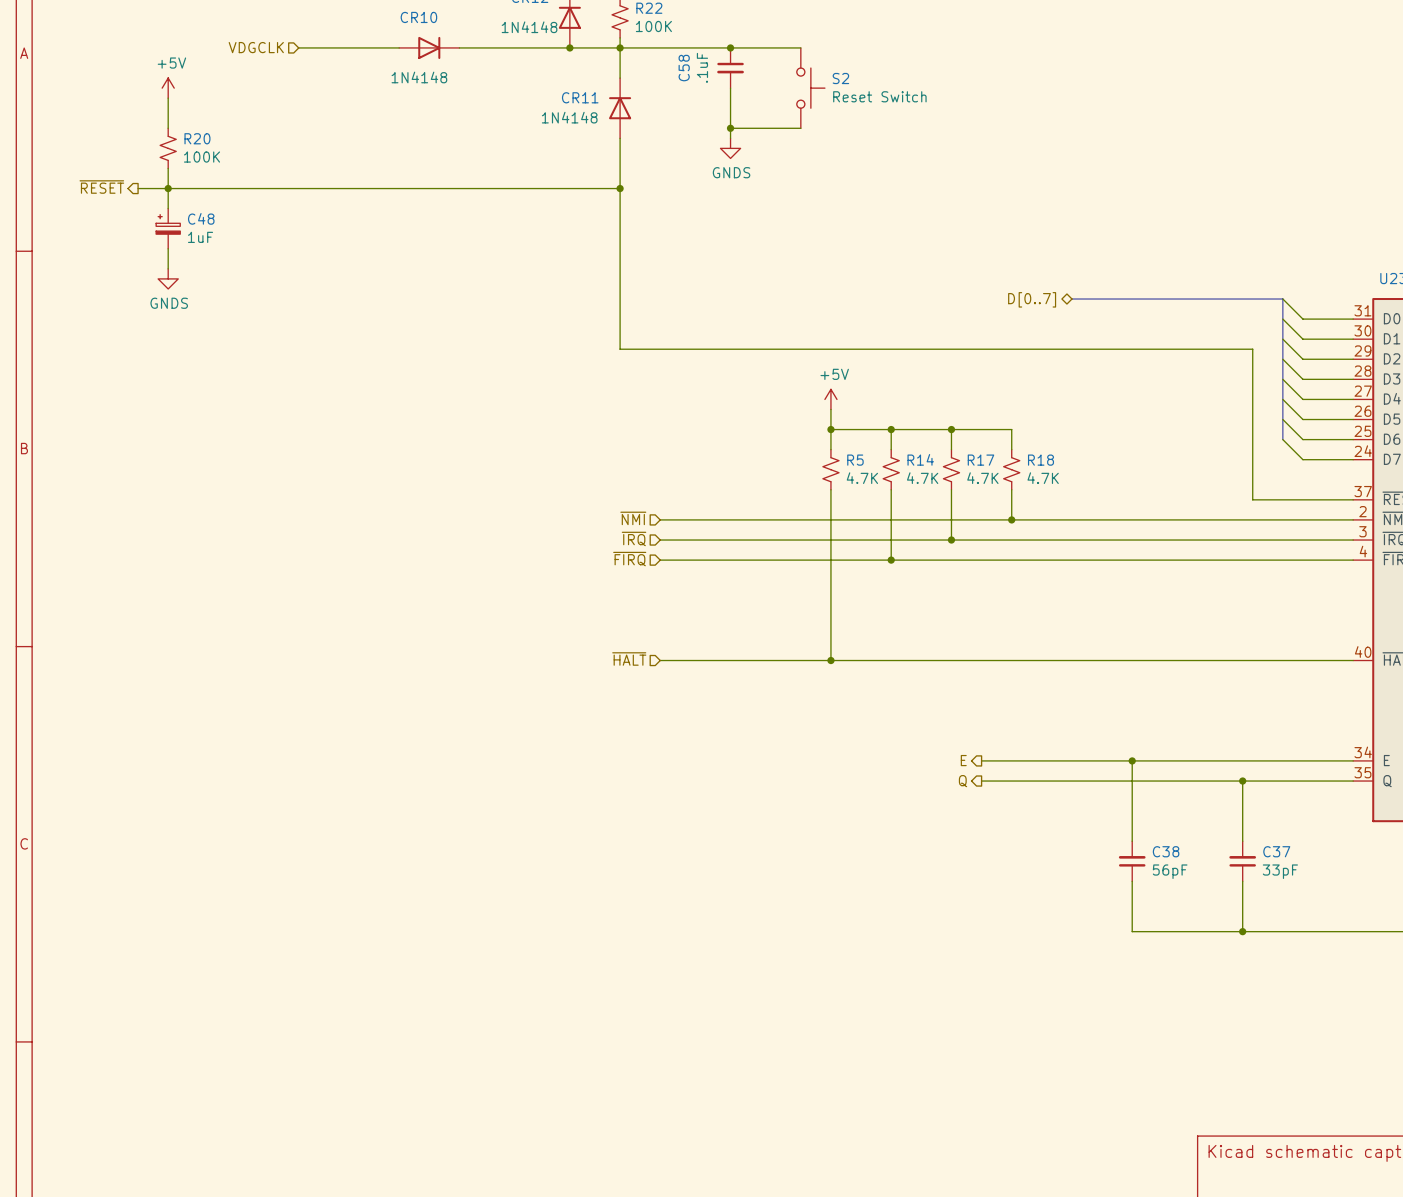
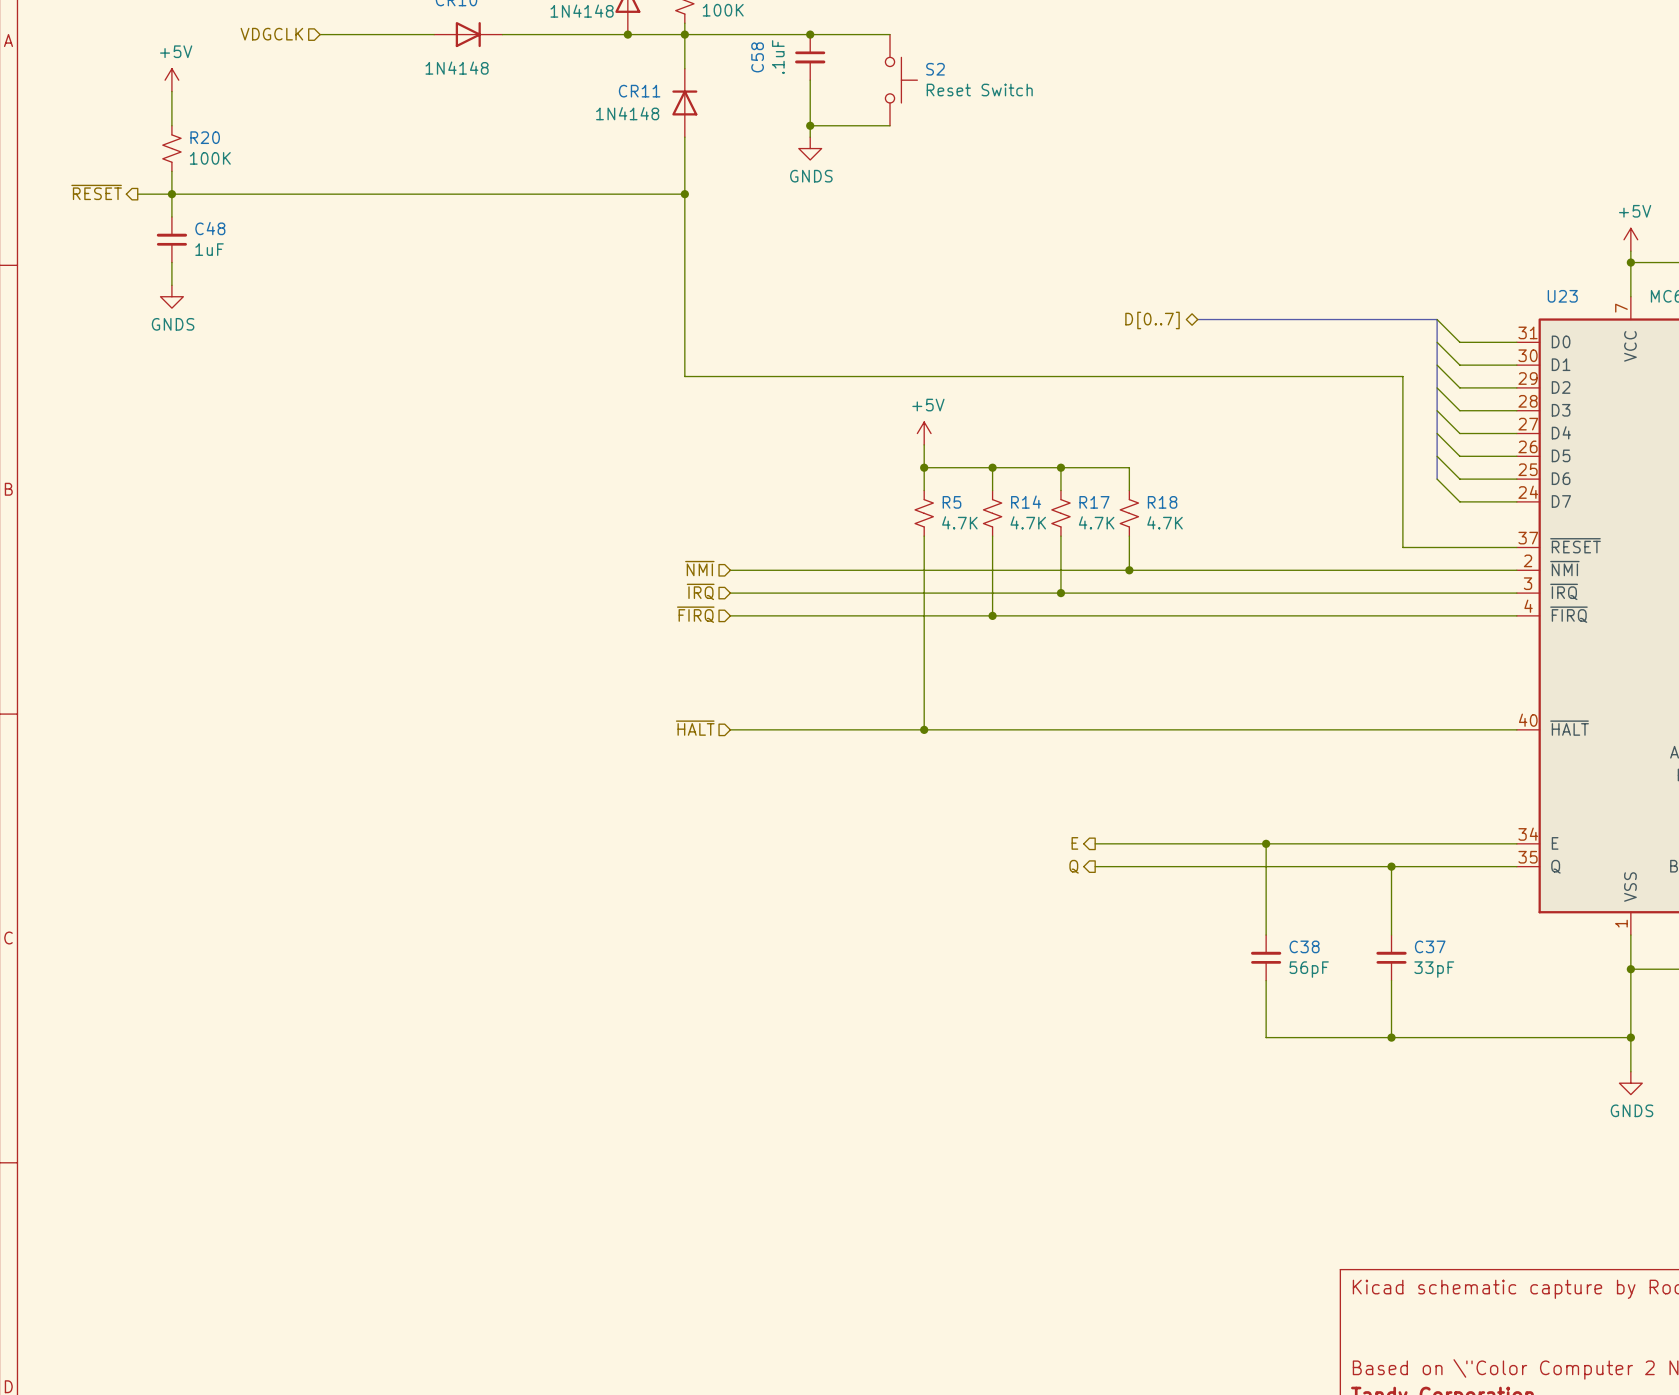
C48 symbol: [156, 208, 181, 249] -> [156, 216, 188, 263]

